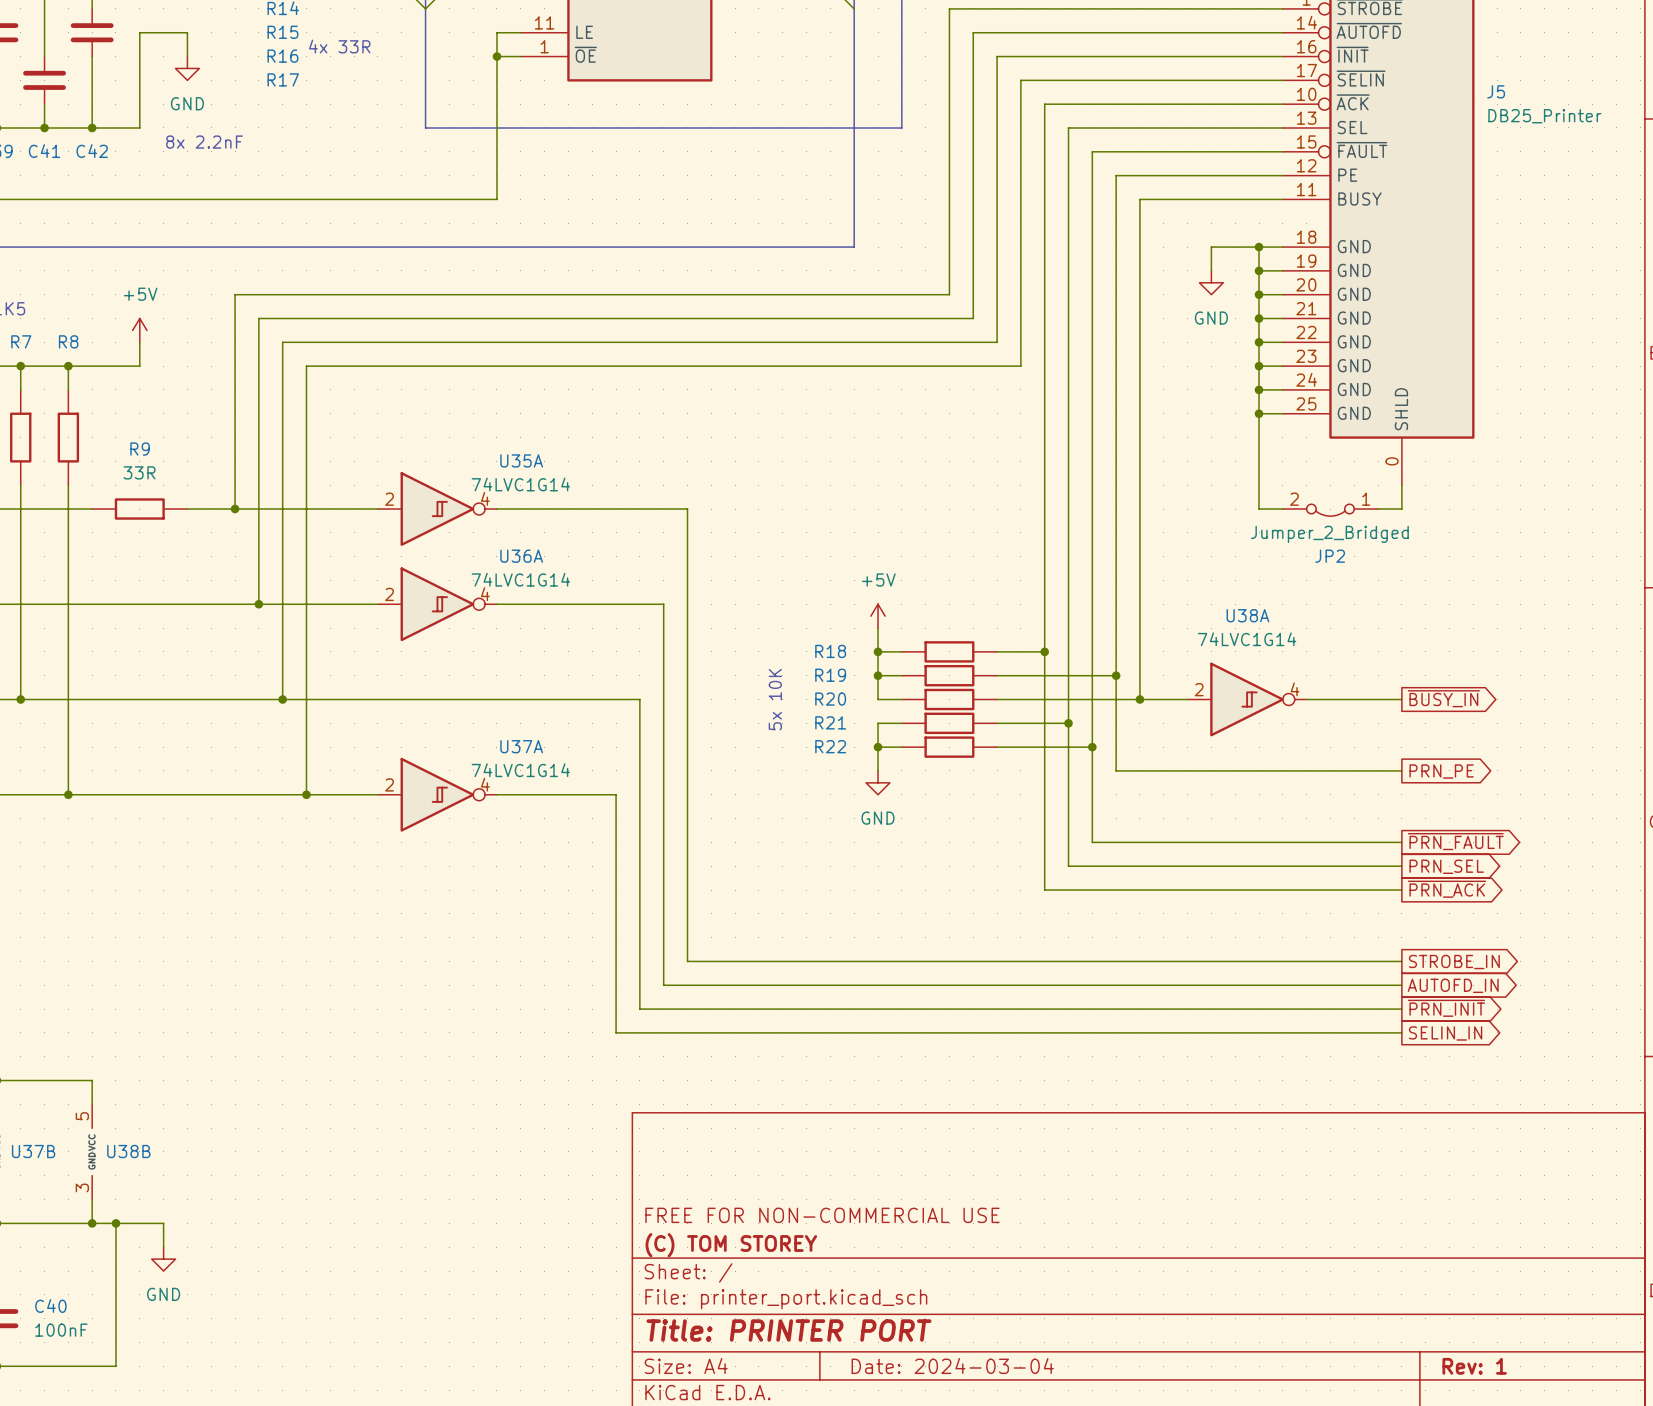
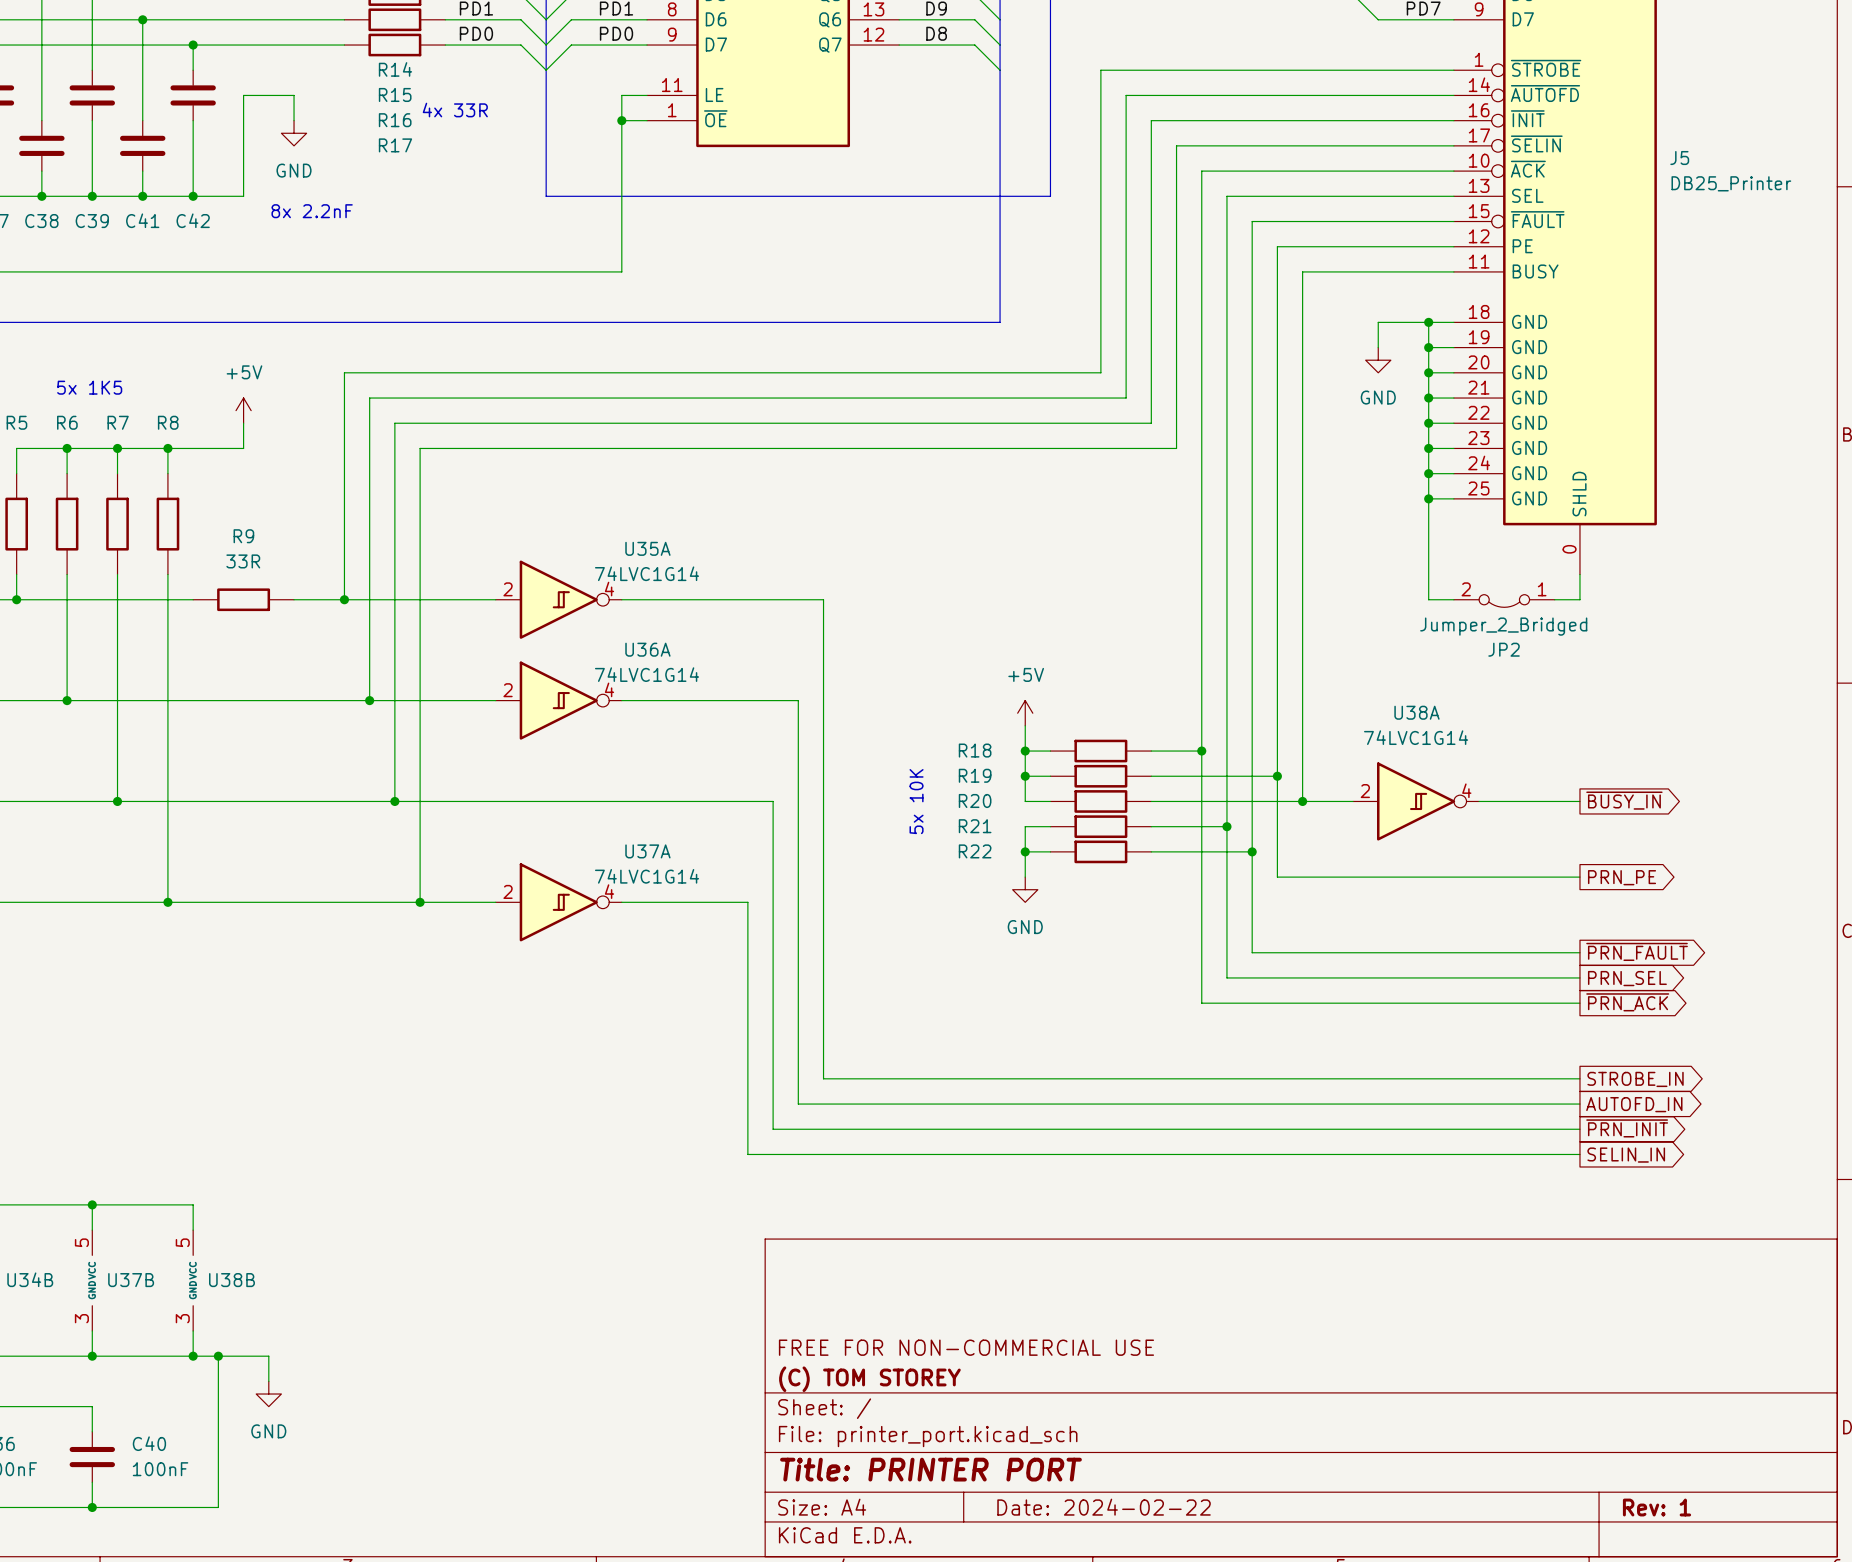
title block: Date: 2024-03-04 (952, 1365) -> Date: 2024-02-22 (1104, 1507)

